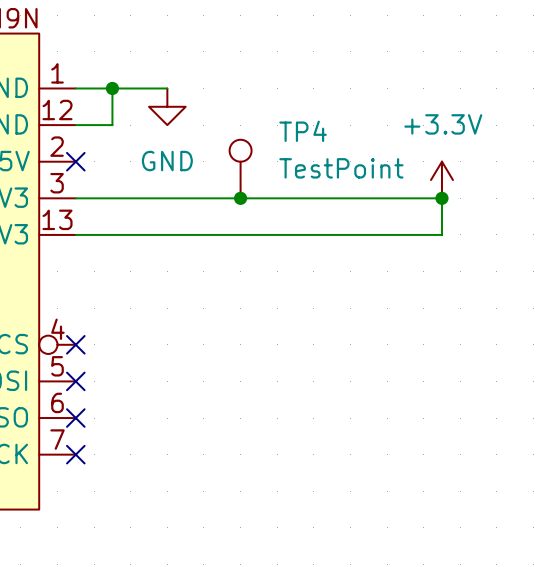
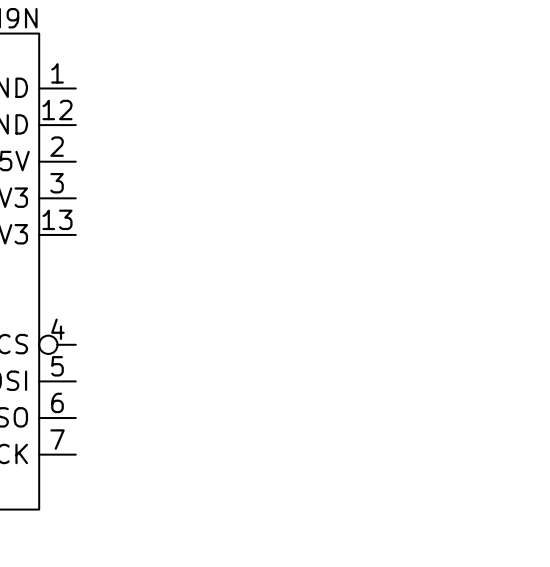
wire: (75, 88) (167, 88) -> none
wire: (112, 88) (112, 125) (75, 125) -> none
junction: (112, 88) -> none
power symbol: GND (167, 106) -> none
no-connect mark: (75, 161) -> none
TP4: TestPoint (240, 169) -> none
power symbol: +3.3V (441, 180) -> none
wire: (75, 198) (441, 198) (441, 234) (75, 234) -> none
junction: (240, 198) -> none
junction: (441, 198) -> none
no-connect mark: (75, 344) -> none
no-connect mark: (75, 381) -> none
no-connect mark: (75, 418) -> none
no-connect mark: (75, 454) -> none

